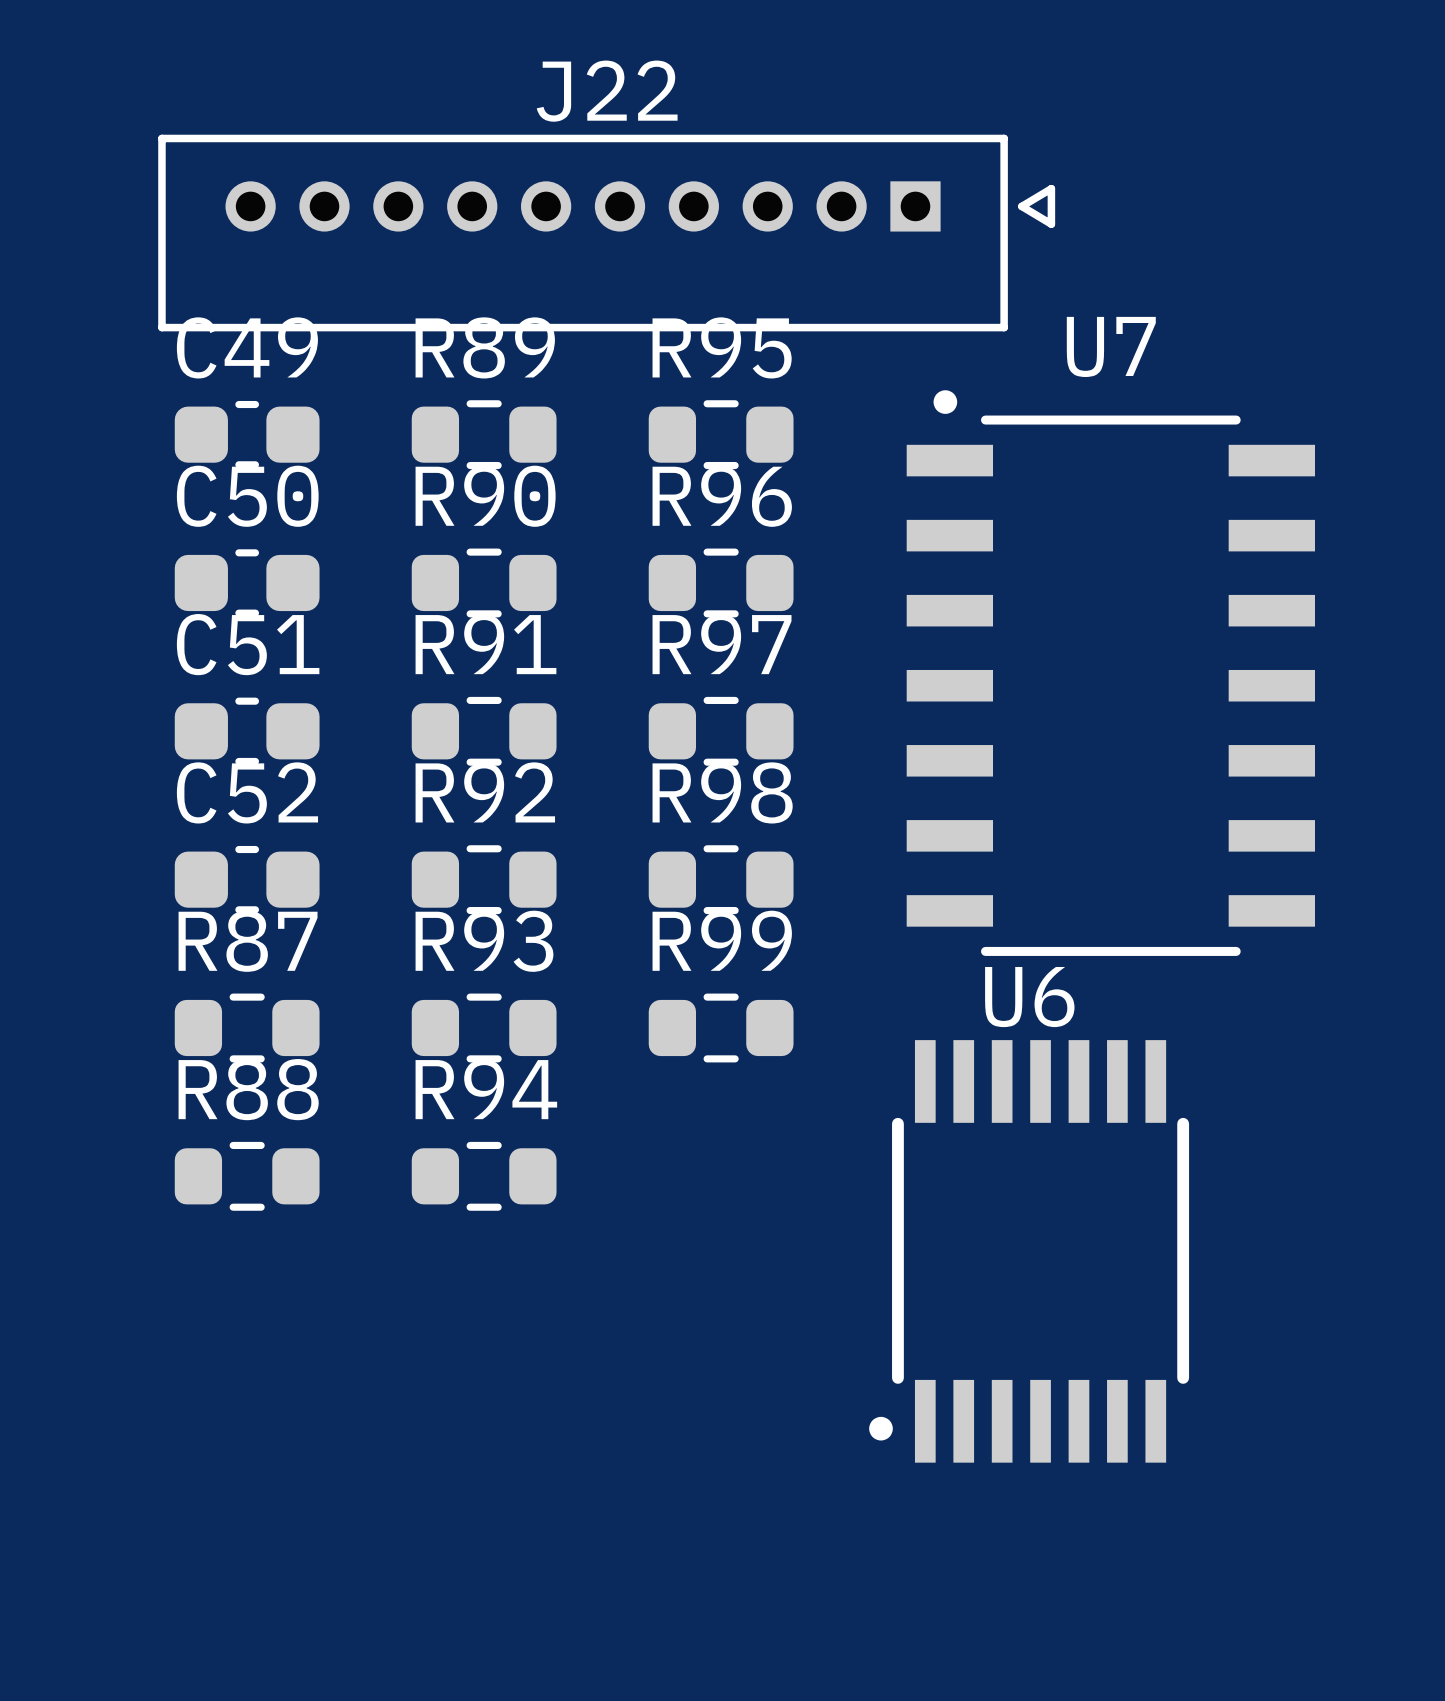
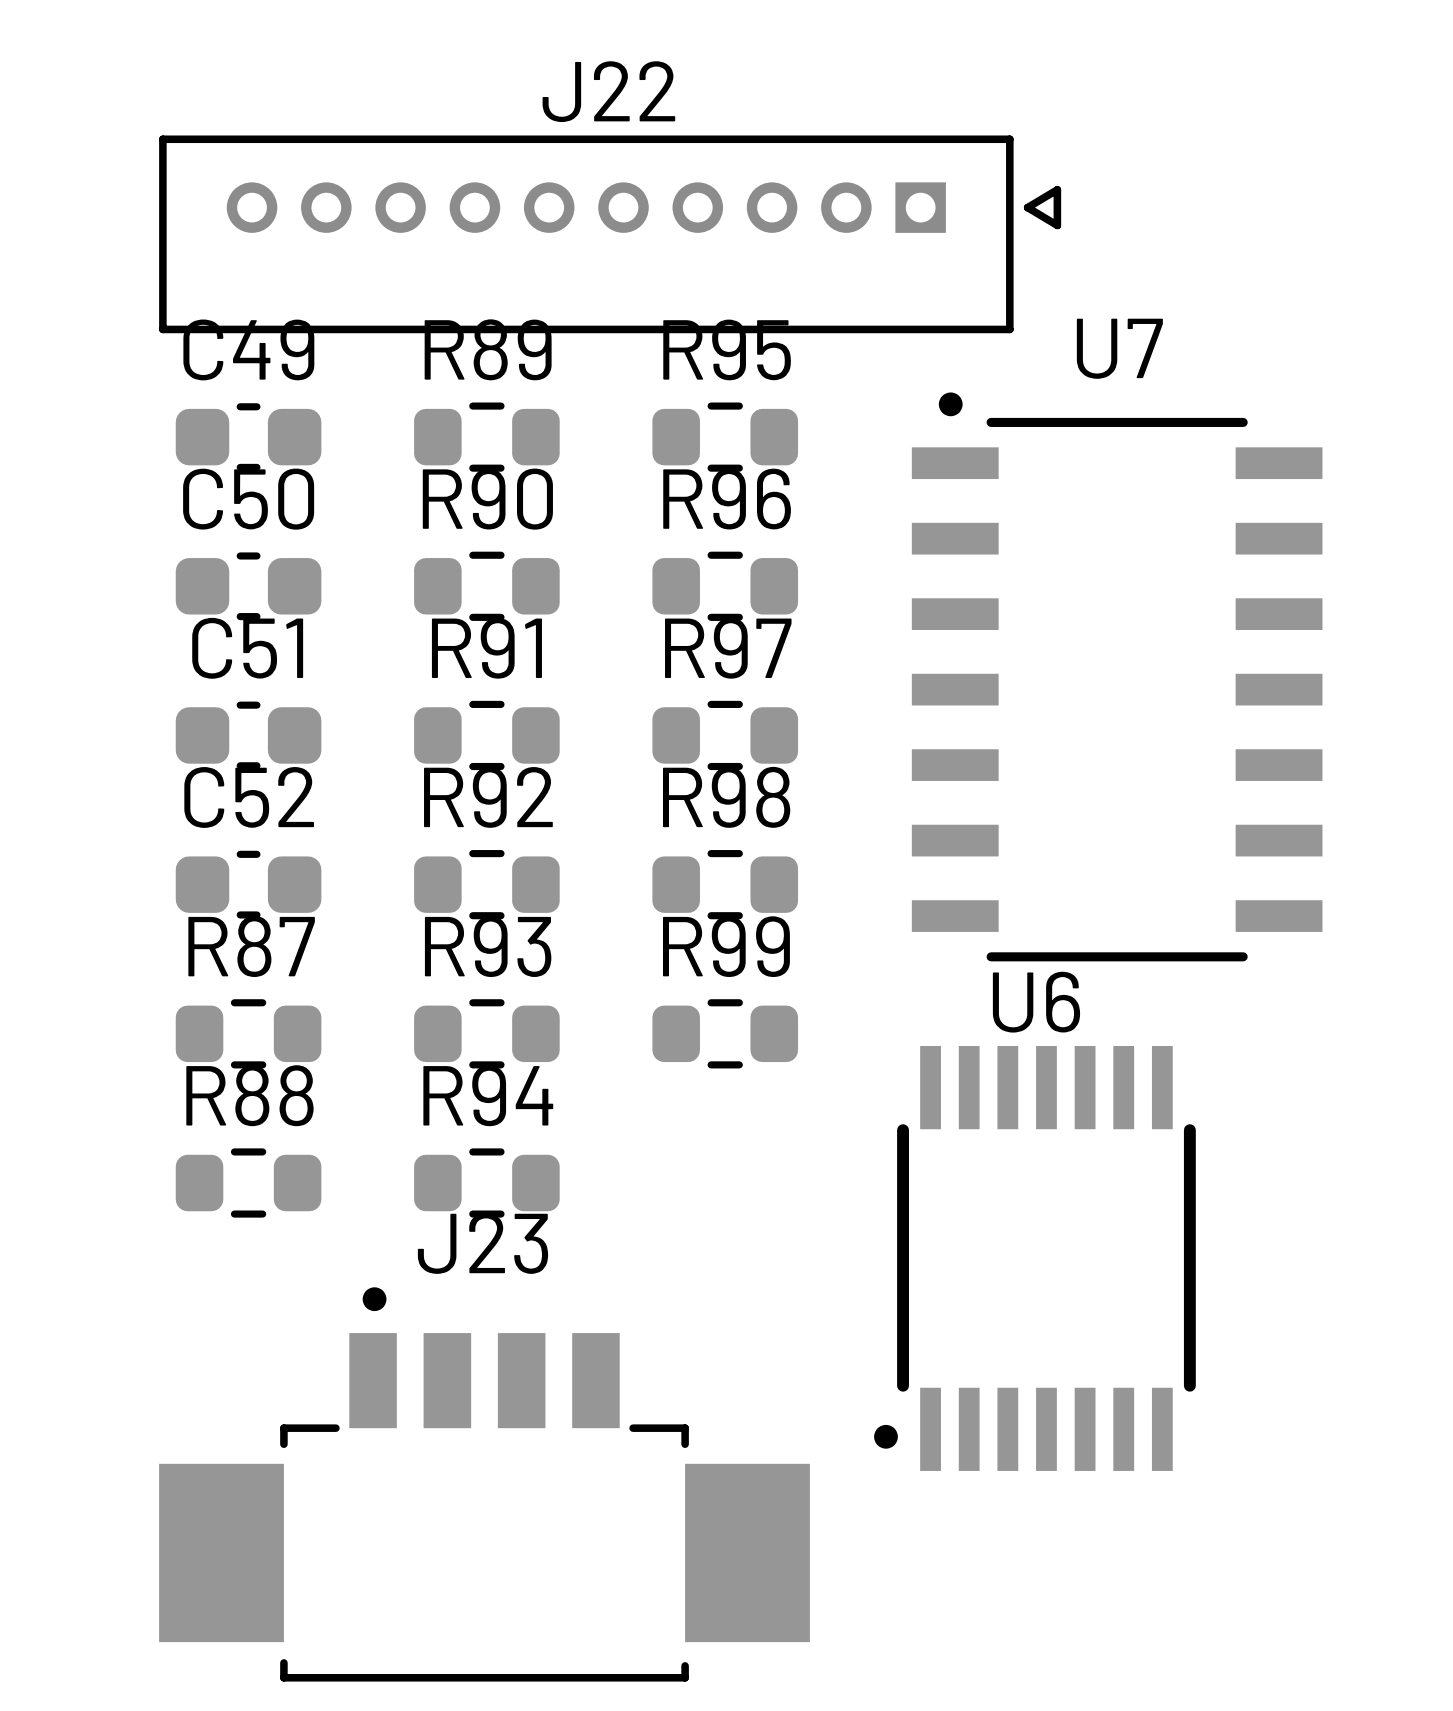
J23: none -> (484, 1484)

